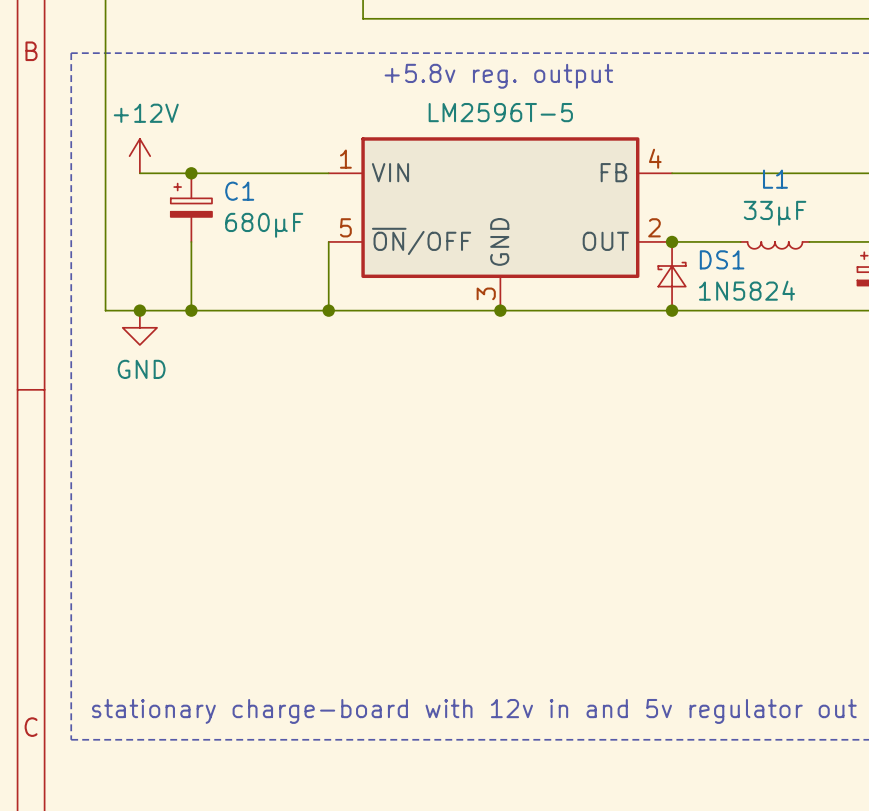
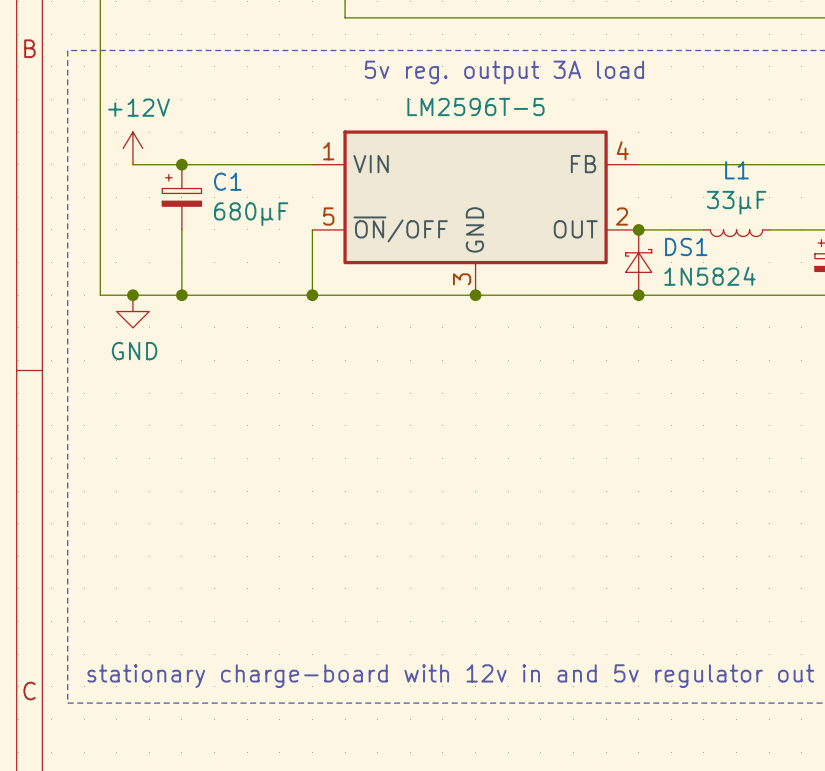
text: +5.8v reg. output (498, 76) -> 5v reg. output 3A load (504, 72)

